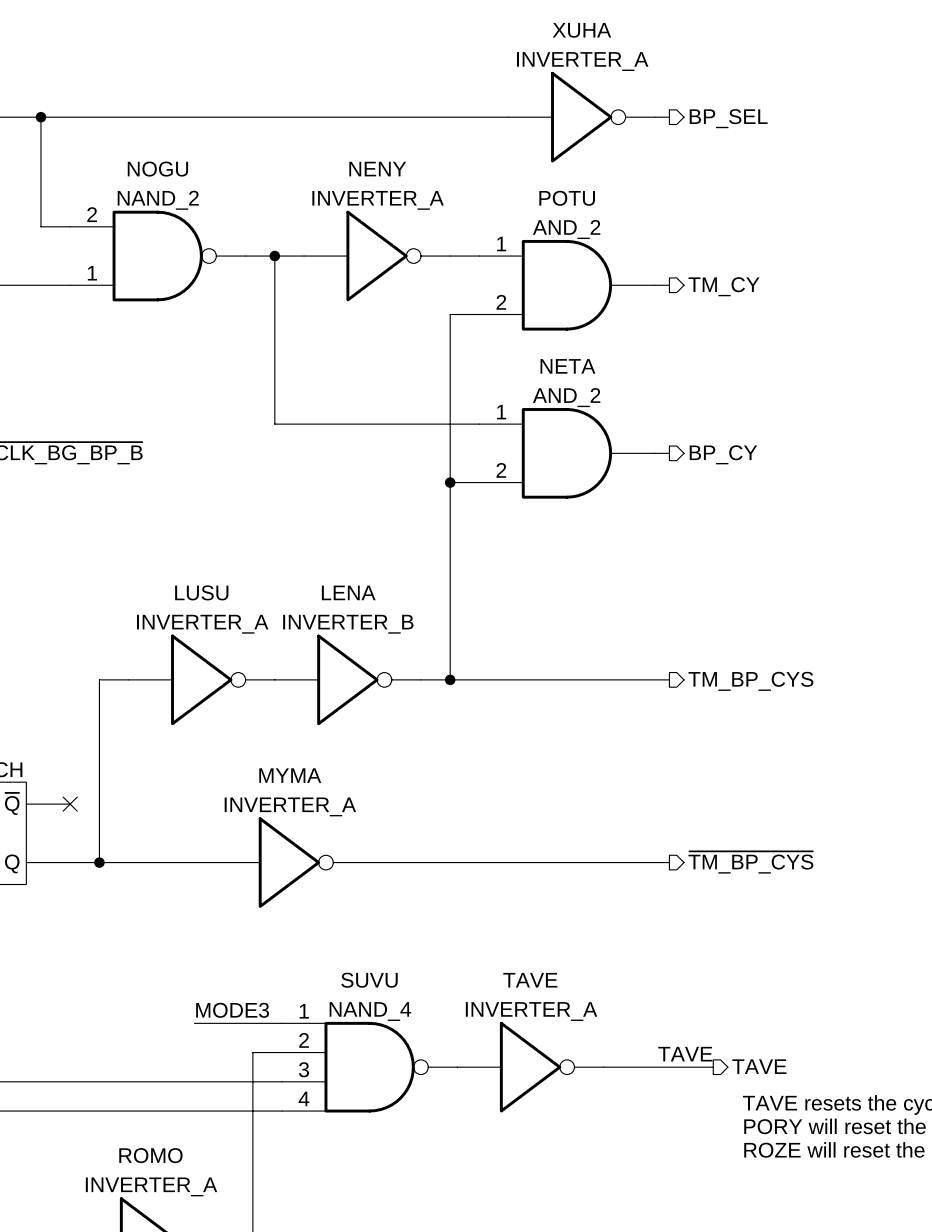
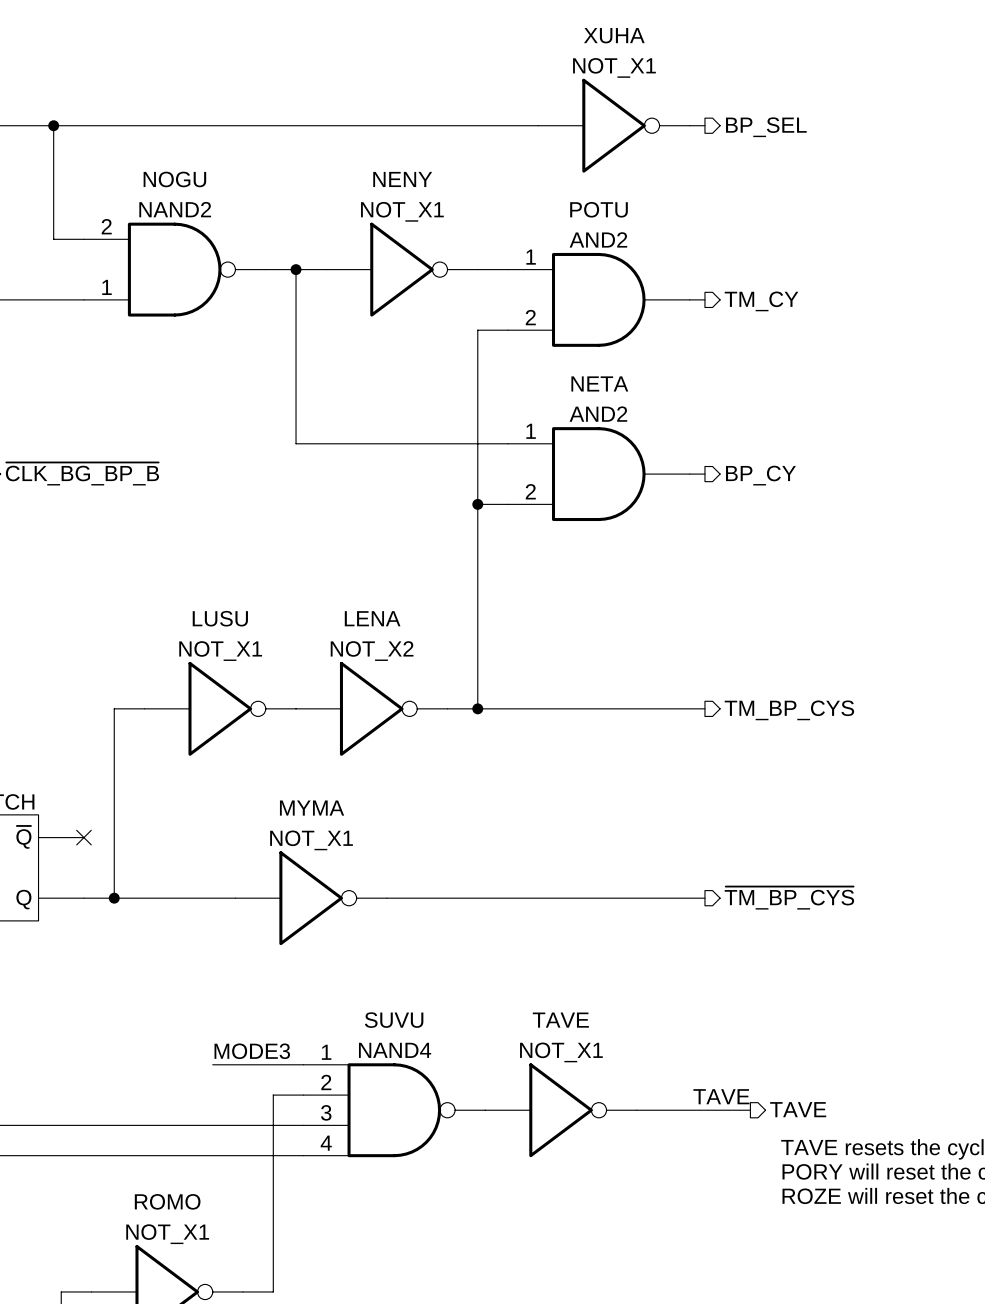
XUHA value: INVERTER_A (582, 61) -> NOT_X1 (614, 67)
NOGU value: NAND_2 (158, 200) -> NAND2 (175, 209)
NENY value: INVERTER_A (378, 200) -> NOT_X1 (402, 211)
POTU value: AND_2 (566, 229) -> AND2 (598, 239)
NETA value: AND_2 (566, 397) -> AND2 (598, 414)
LUSU value: INVERTER_A (202, 624) -> NOT_X1 (220, 651)
LENA value: INVERTER_B (348, 624) -> NOT_X2 (372, 651)
MYMA value: INVERTER_A (290, 806) -> NOT_X1 (311, 840)
SUVU value: NAND_4 (370, 1011) -> NAND4 (395, 1050)
TAVE value: INVERTER_A (531, 1011) -> NOT_X1 (561, 1052)
ROMO value: INVERTER_A (151, 1186) -> NOT_X1 (167, 1234)

